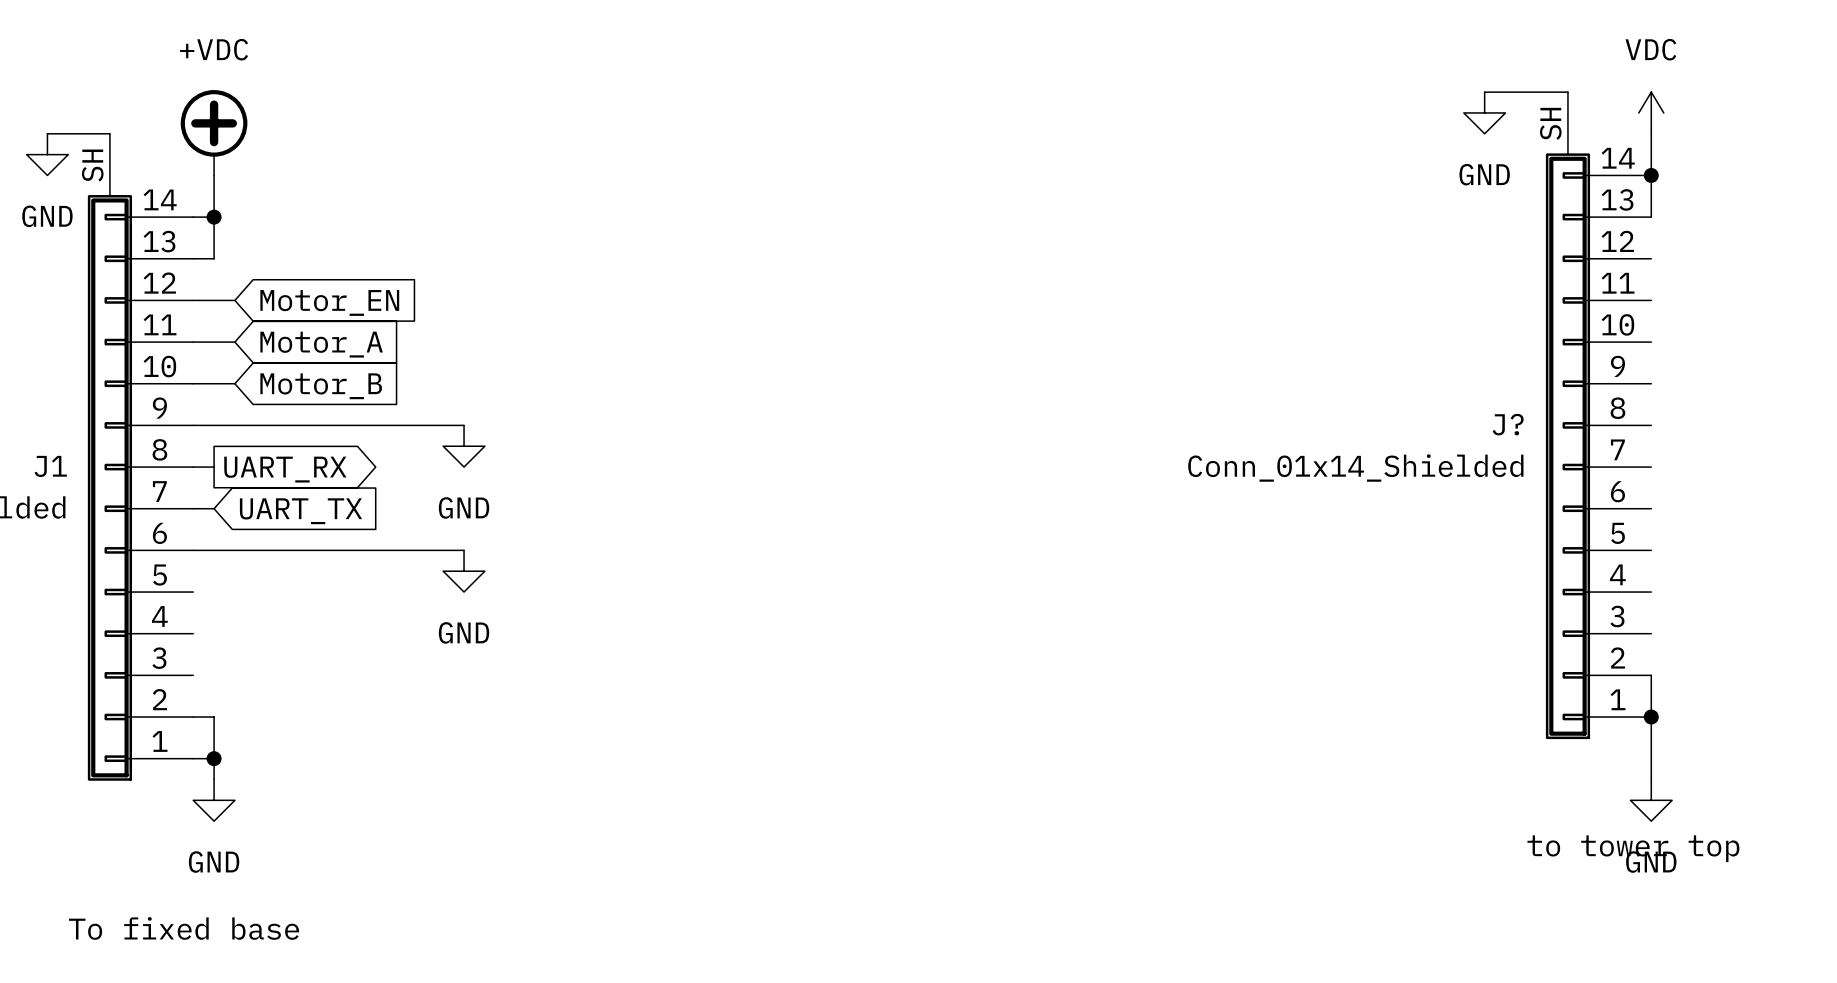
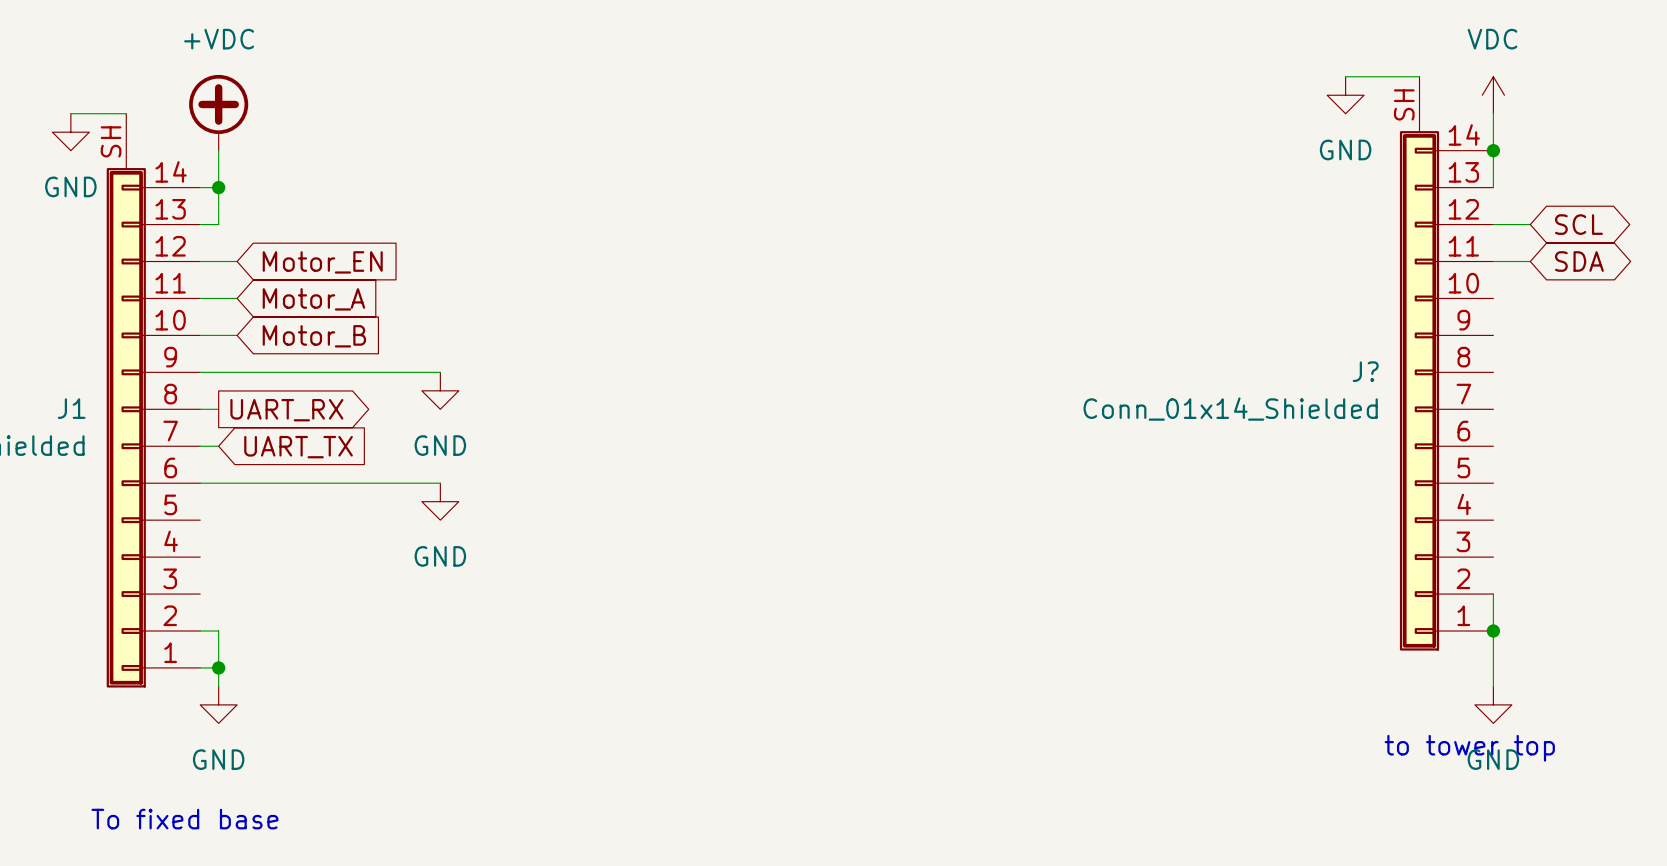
wire: none -> (1493, 224) (1530, 224)
global label: none -> SCL (1578, 224)
wire: none -> (1493, 261) (1530, 261)
global label: none -> SDA (1579, 261)

